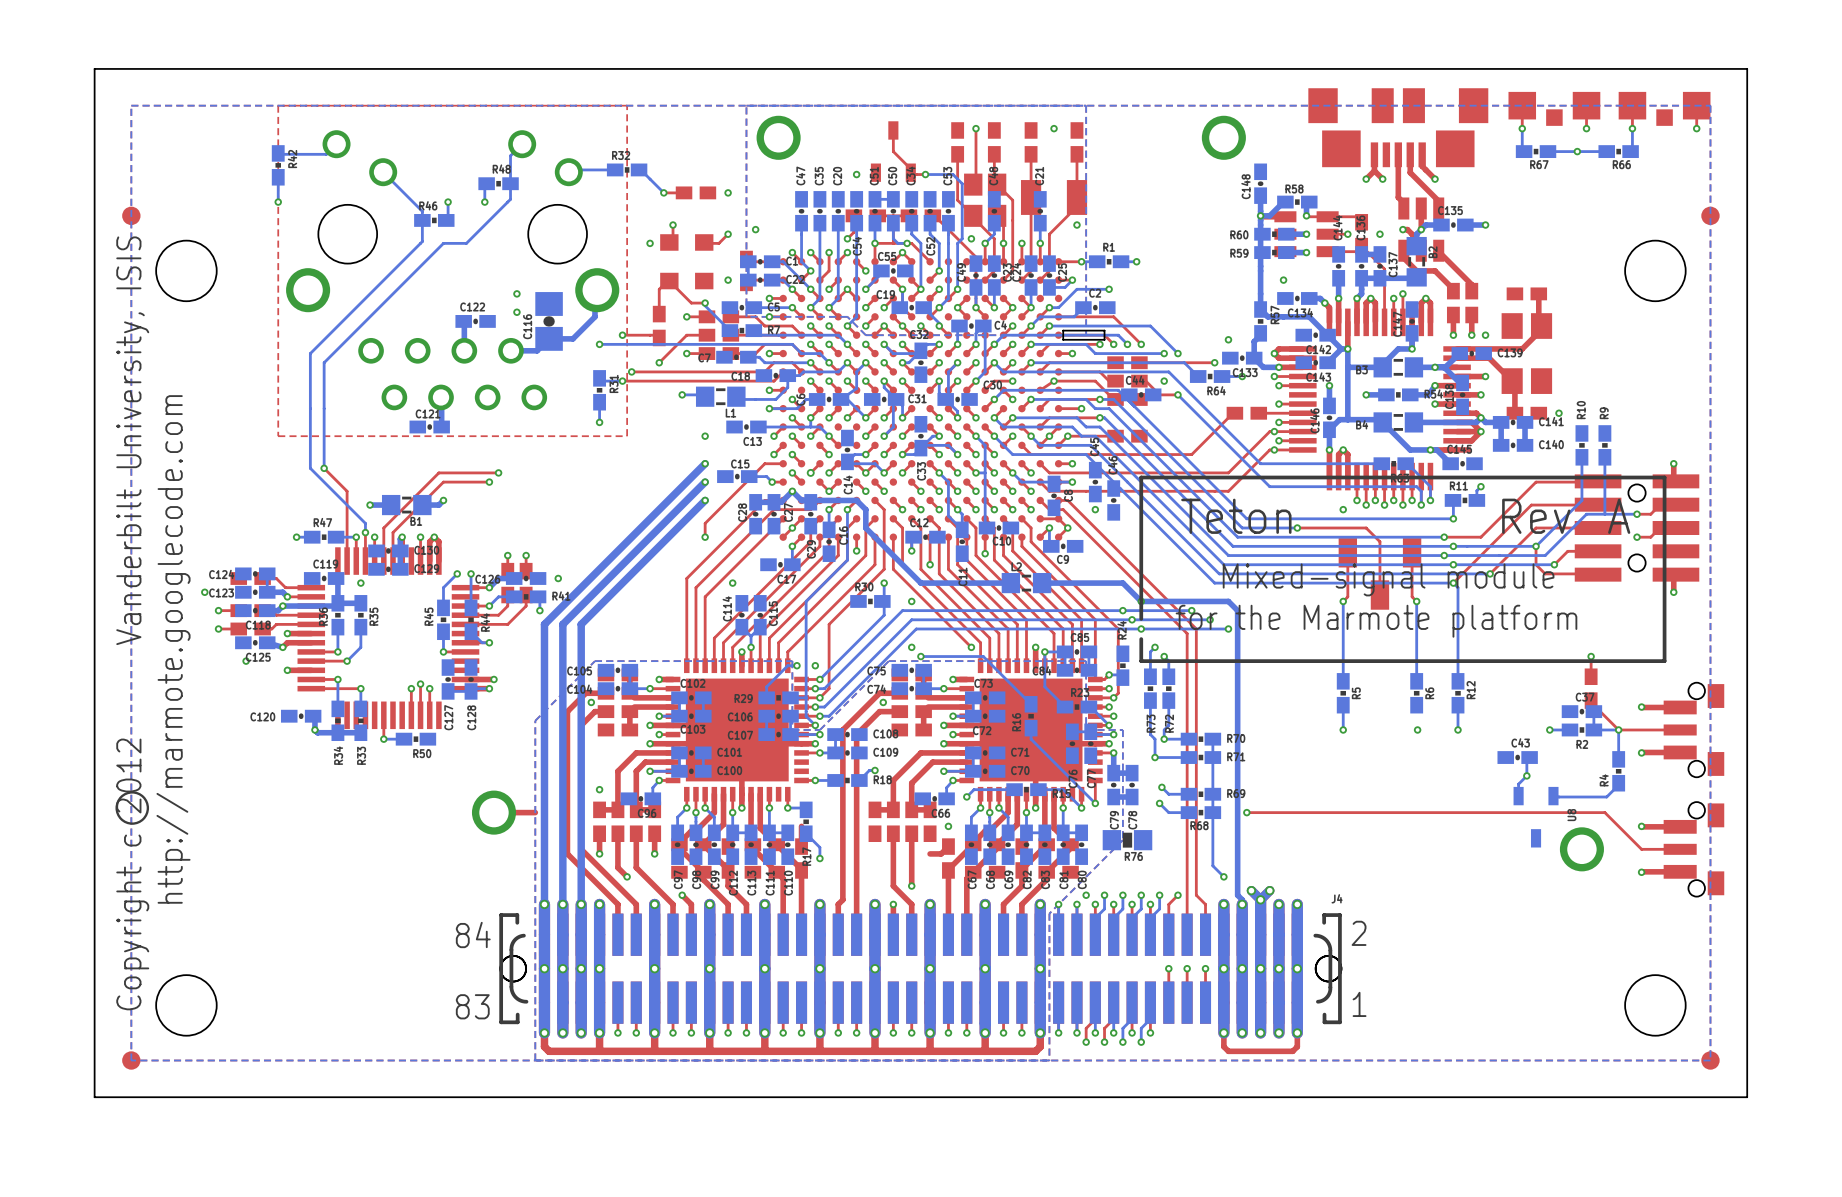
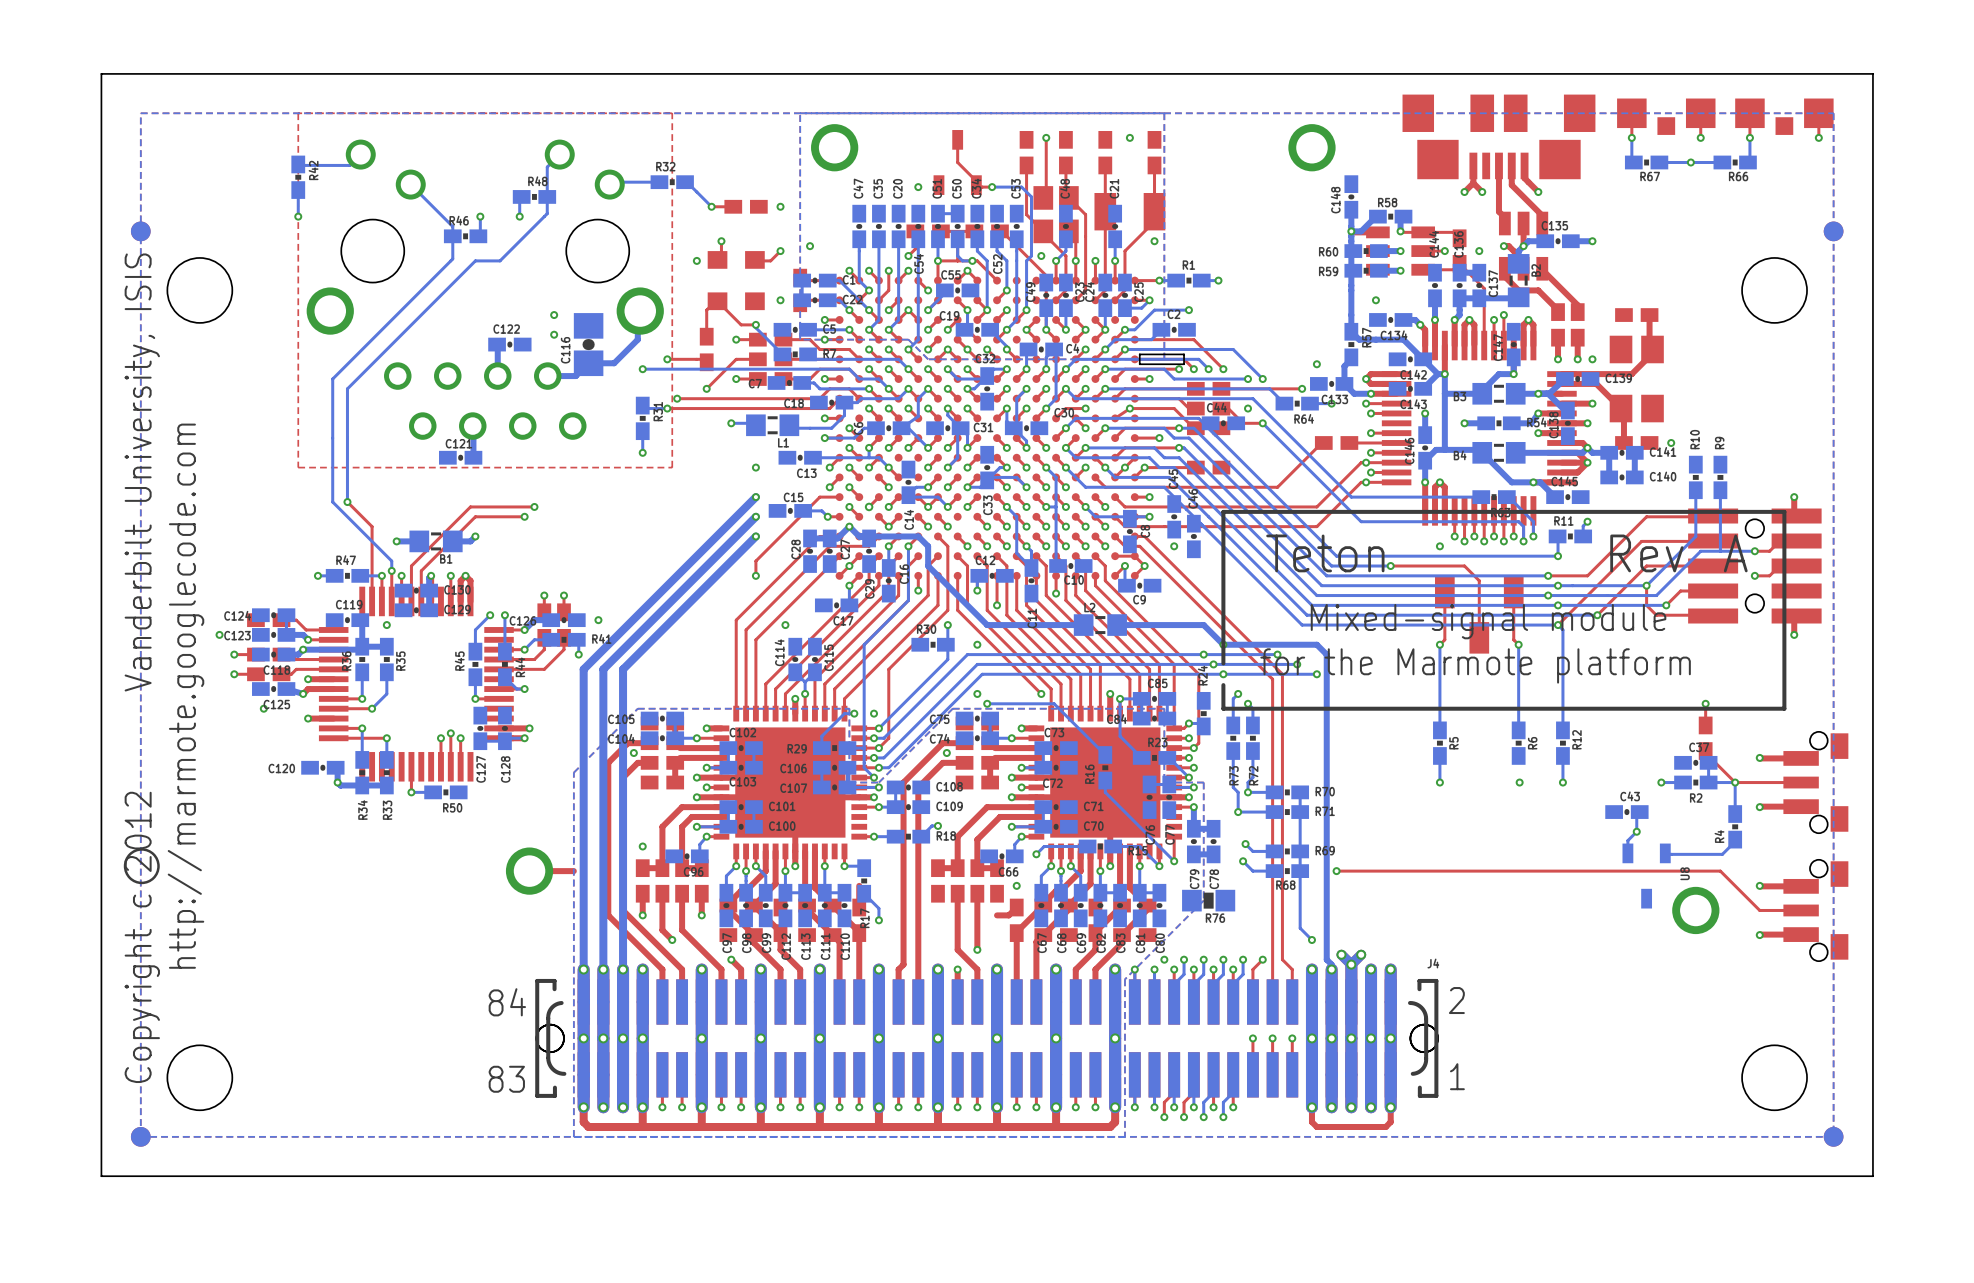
part: none -> (140, 231)
part: none -> (1833, 231)
part: none -> (140, 1136)
part: none -> (1833, 1136)

